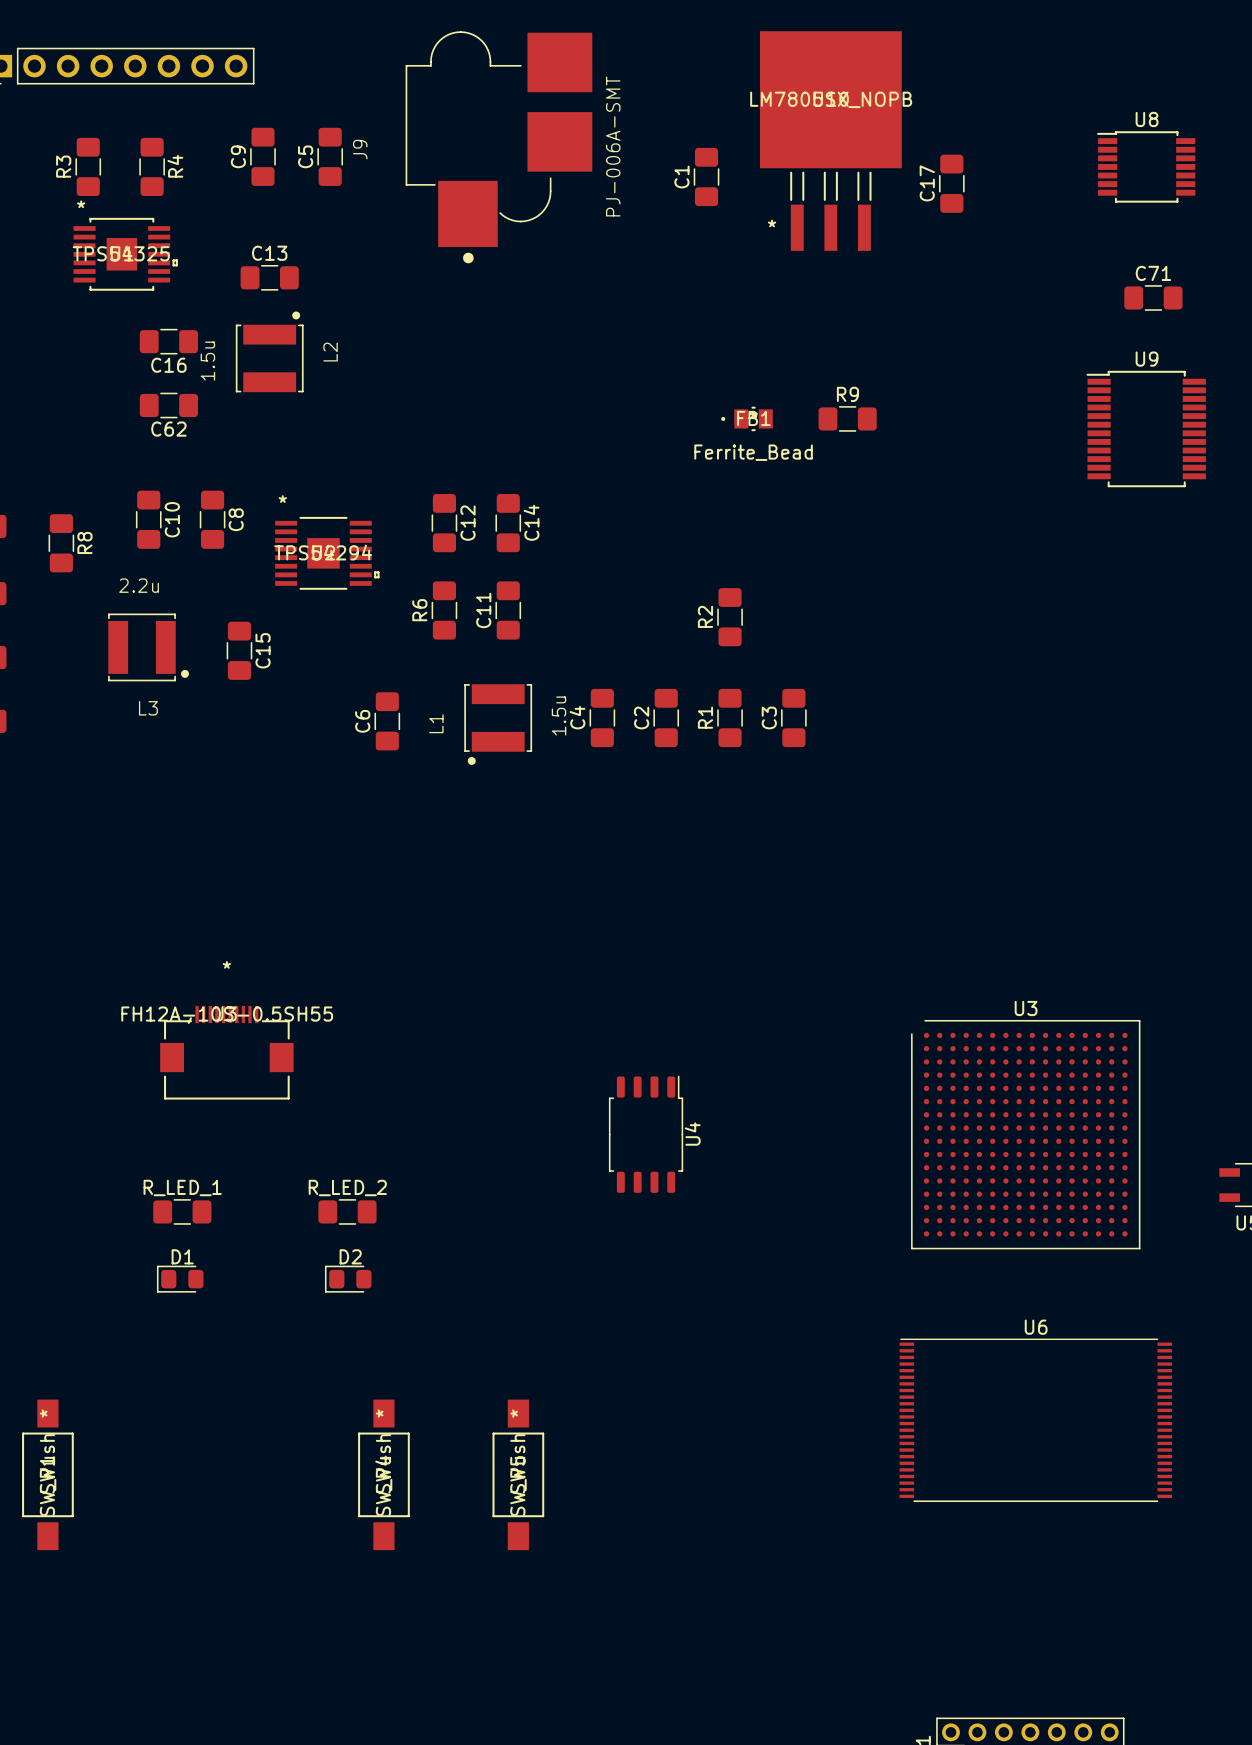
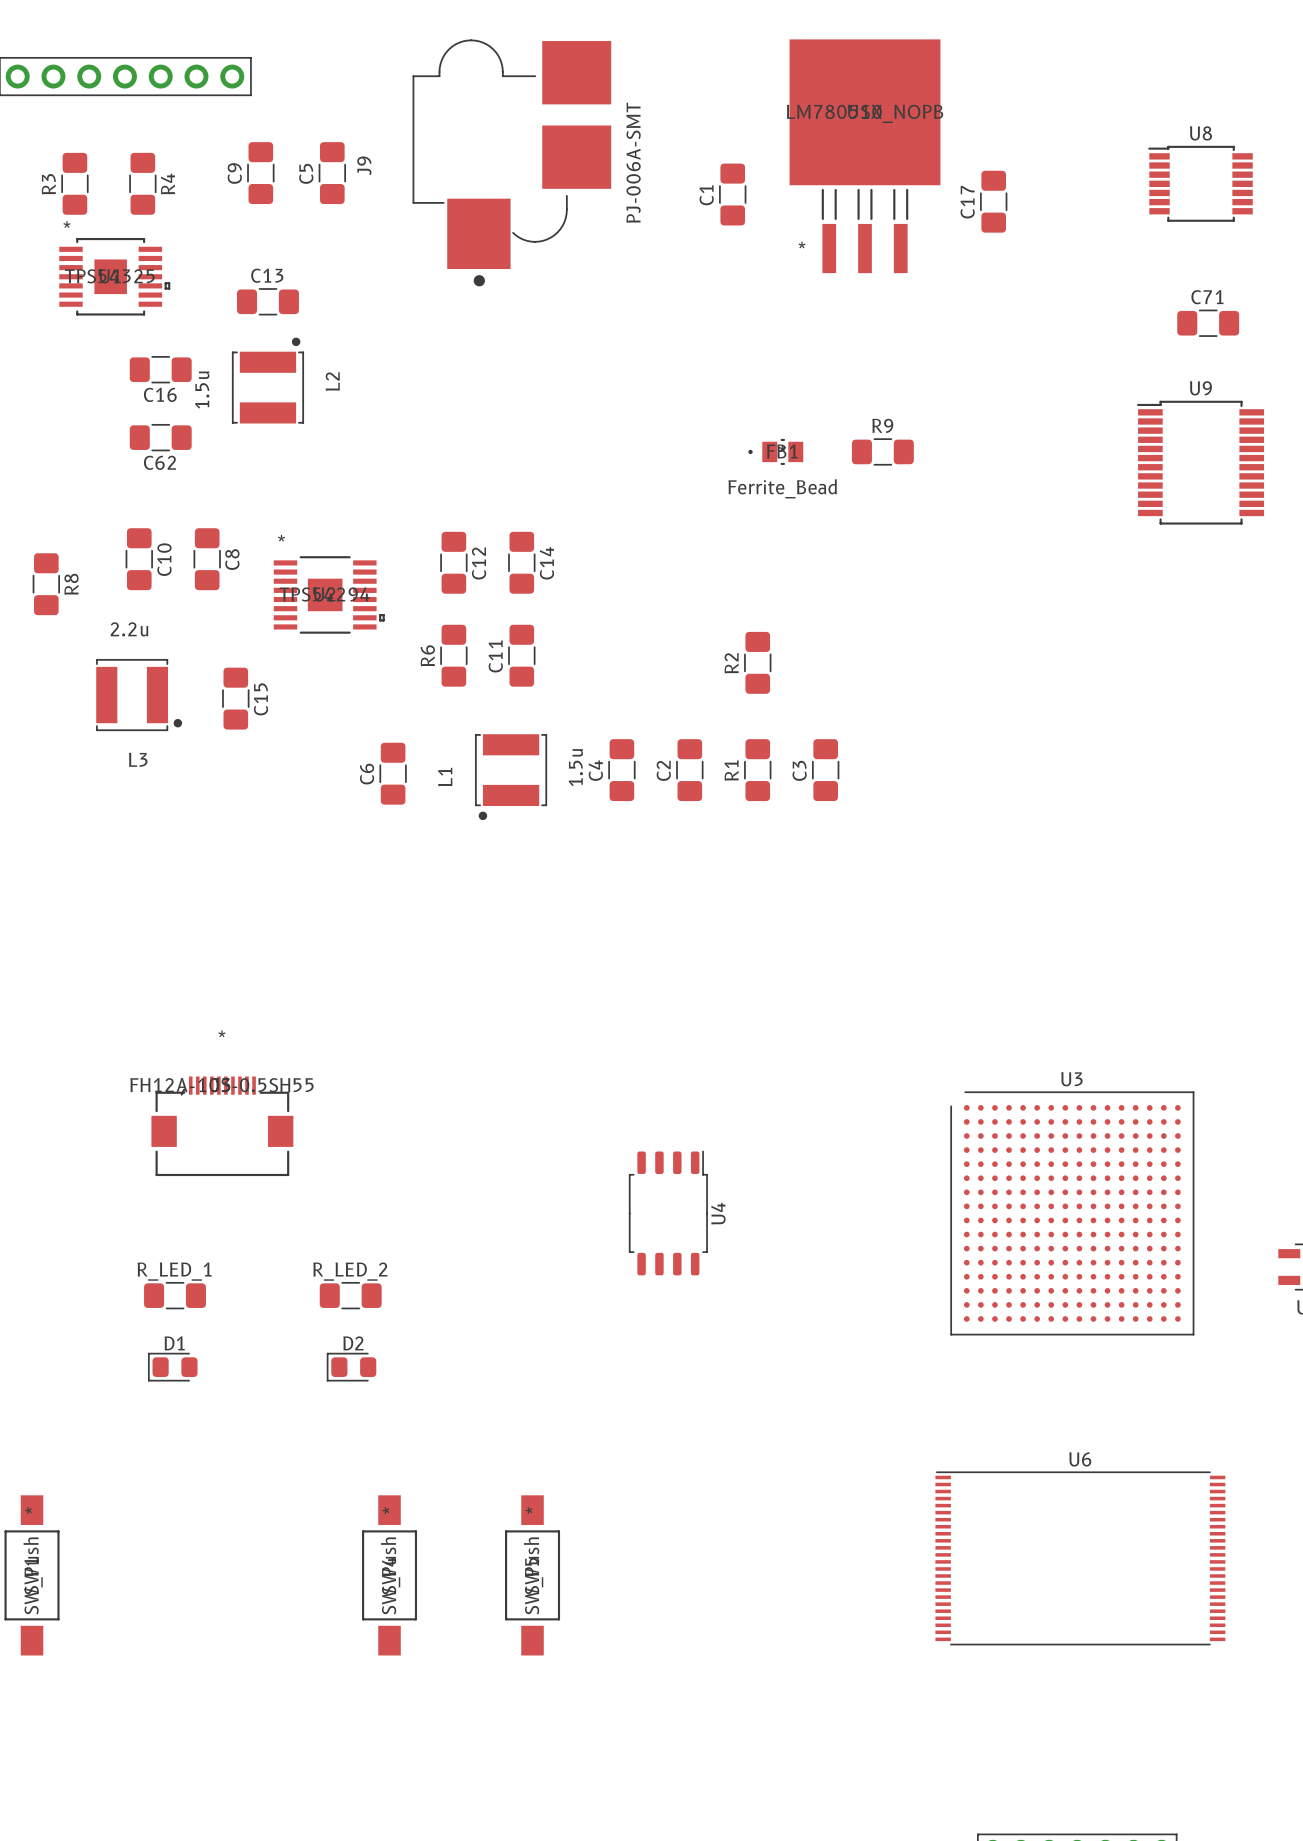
U6 position: (1035, 1420) -> (1080, 1558)

